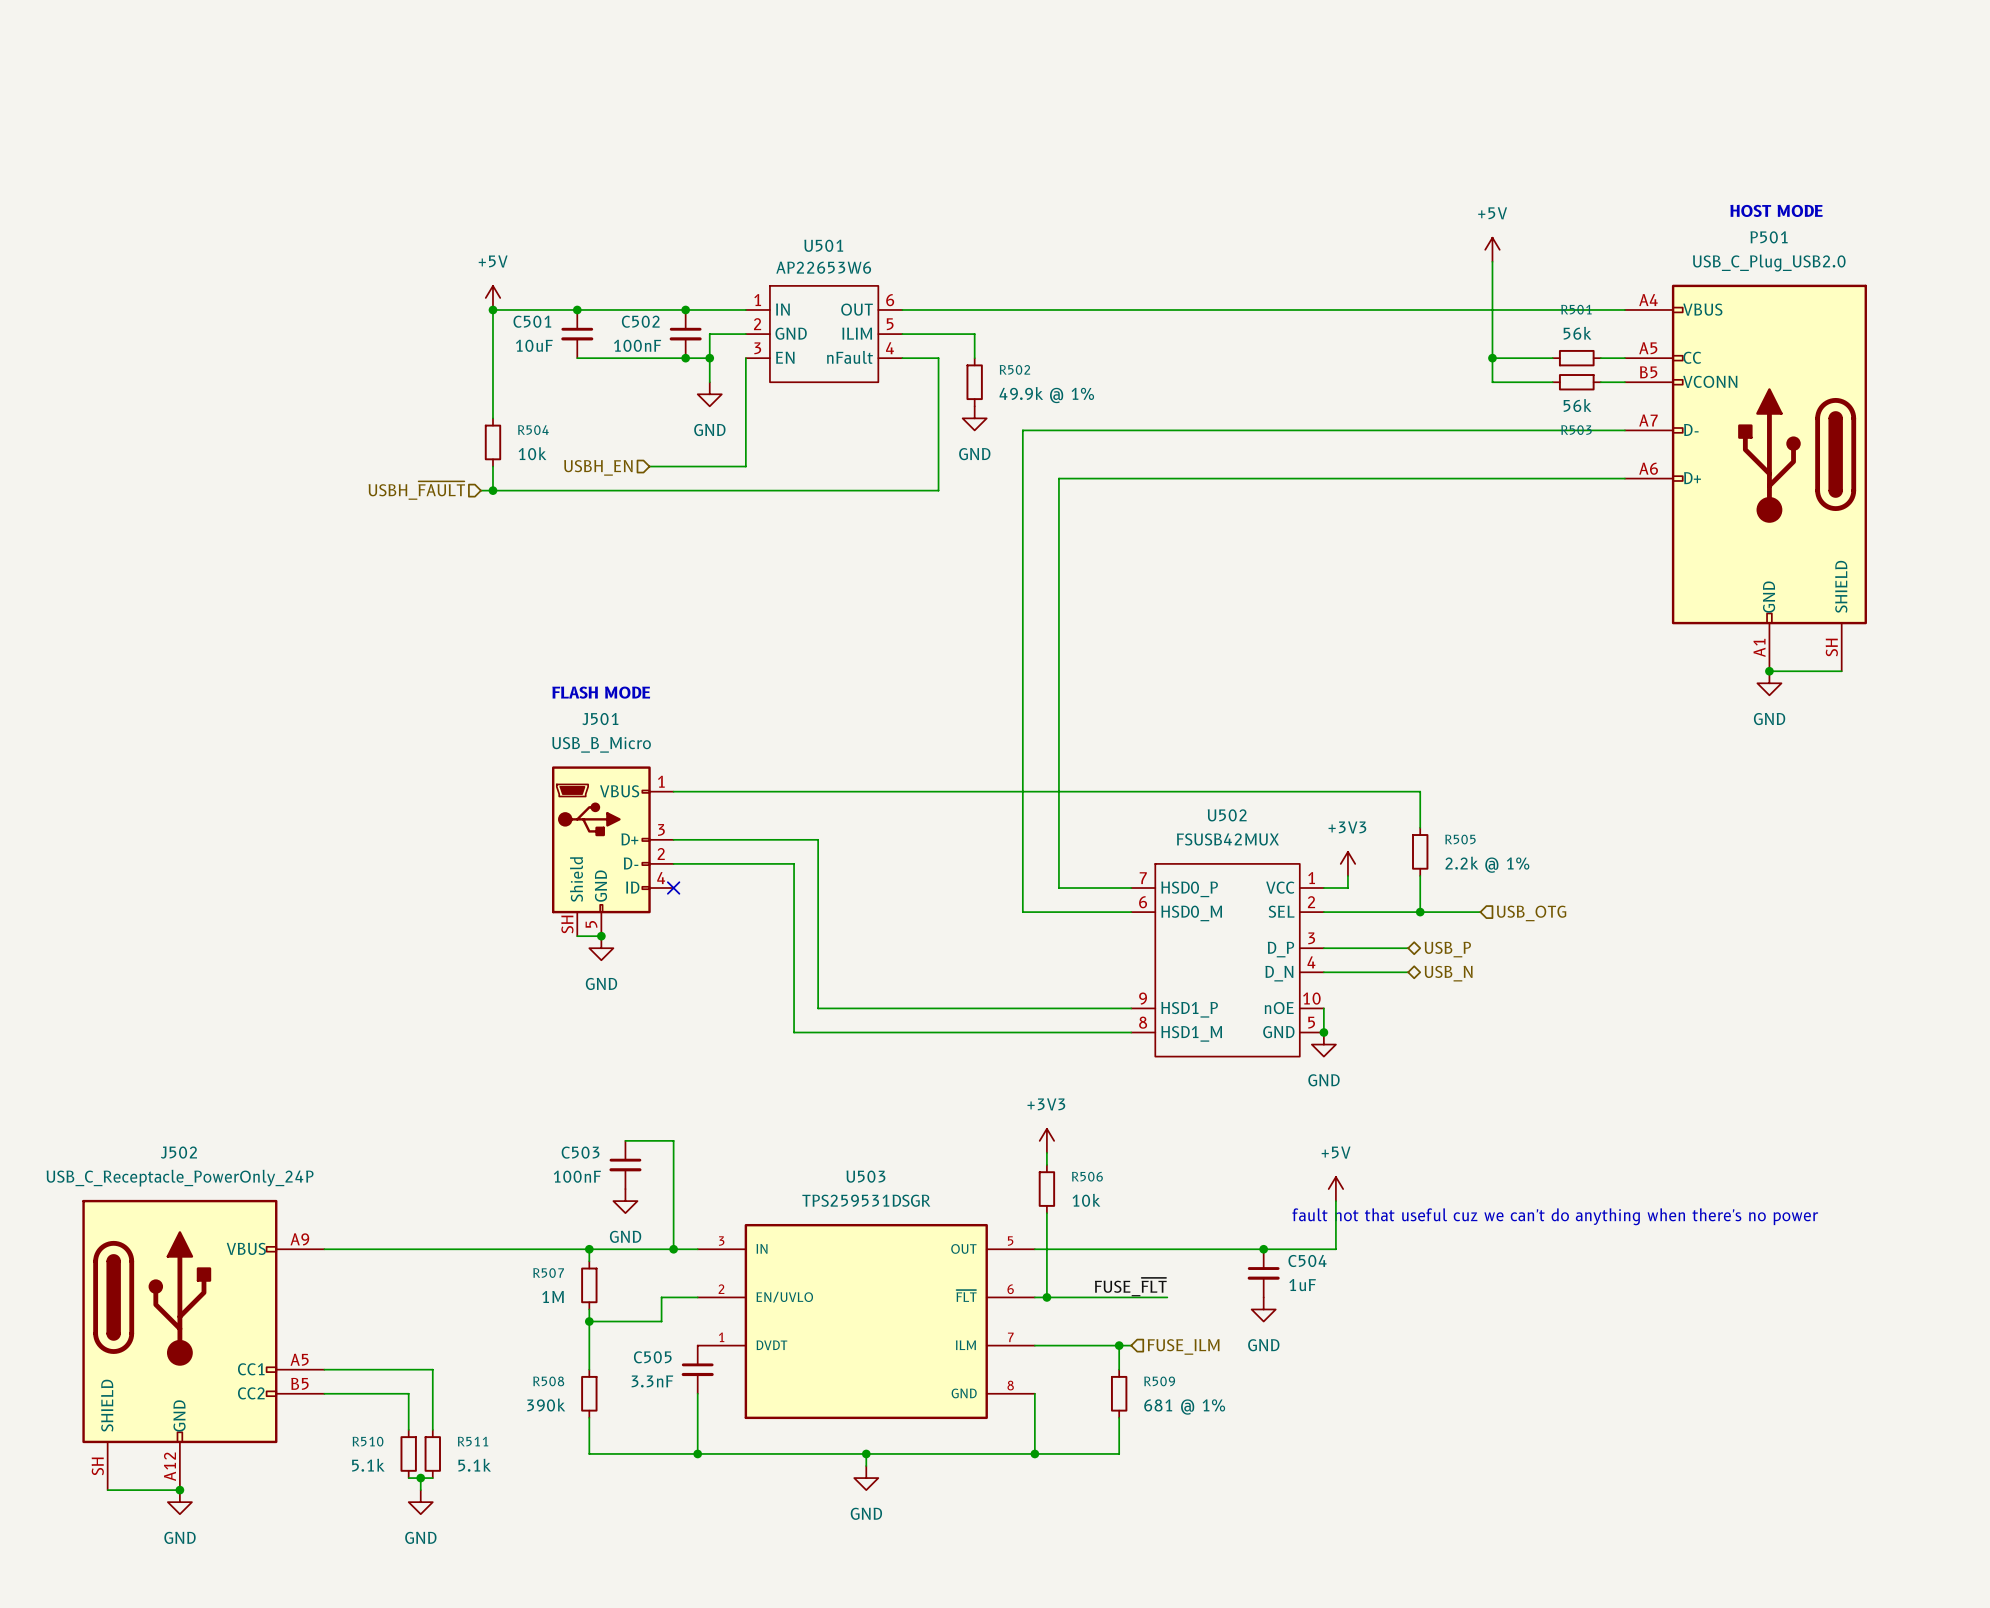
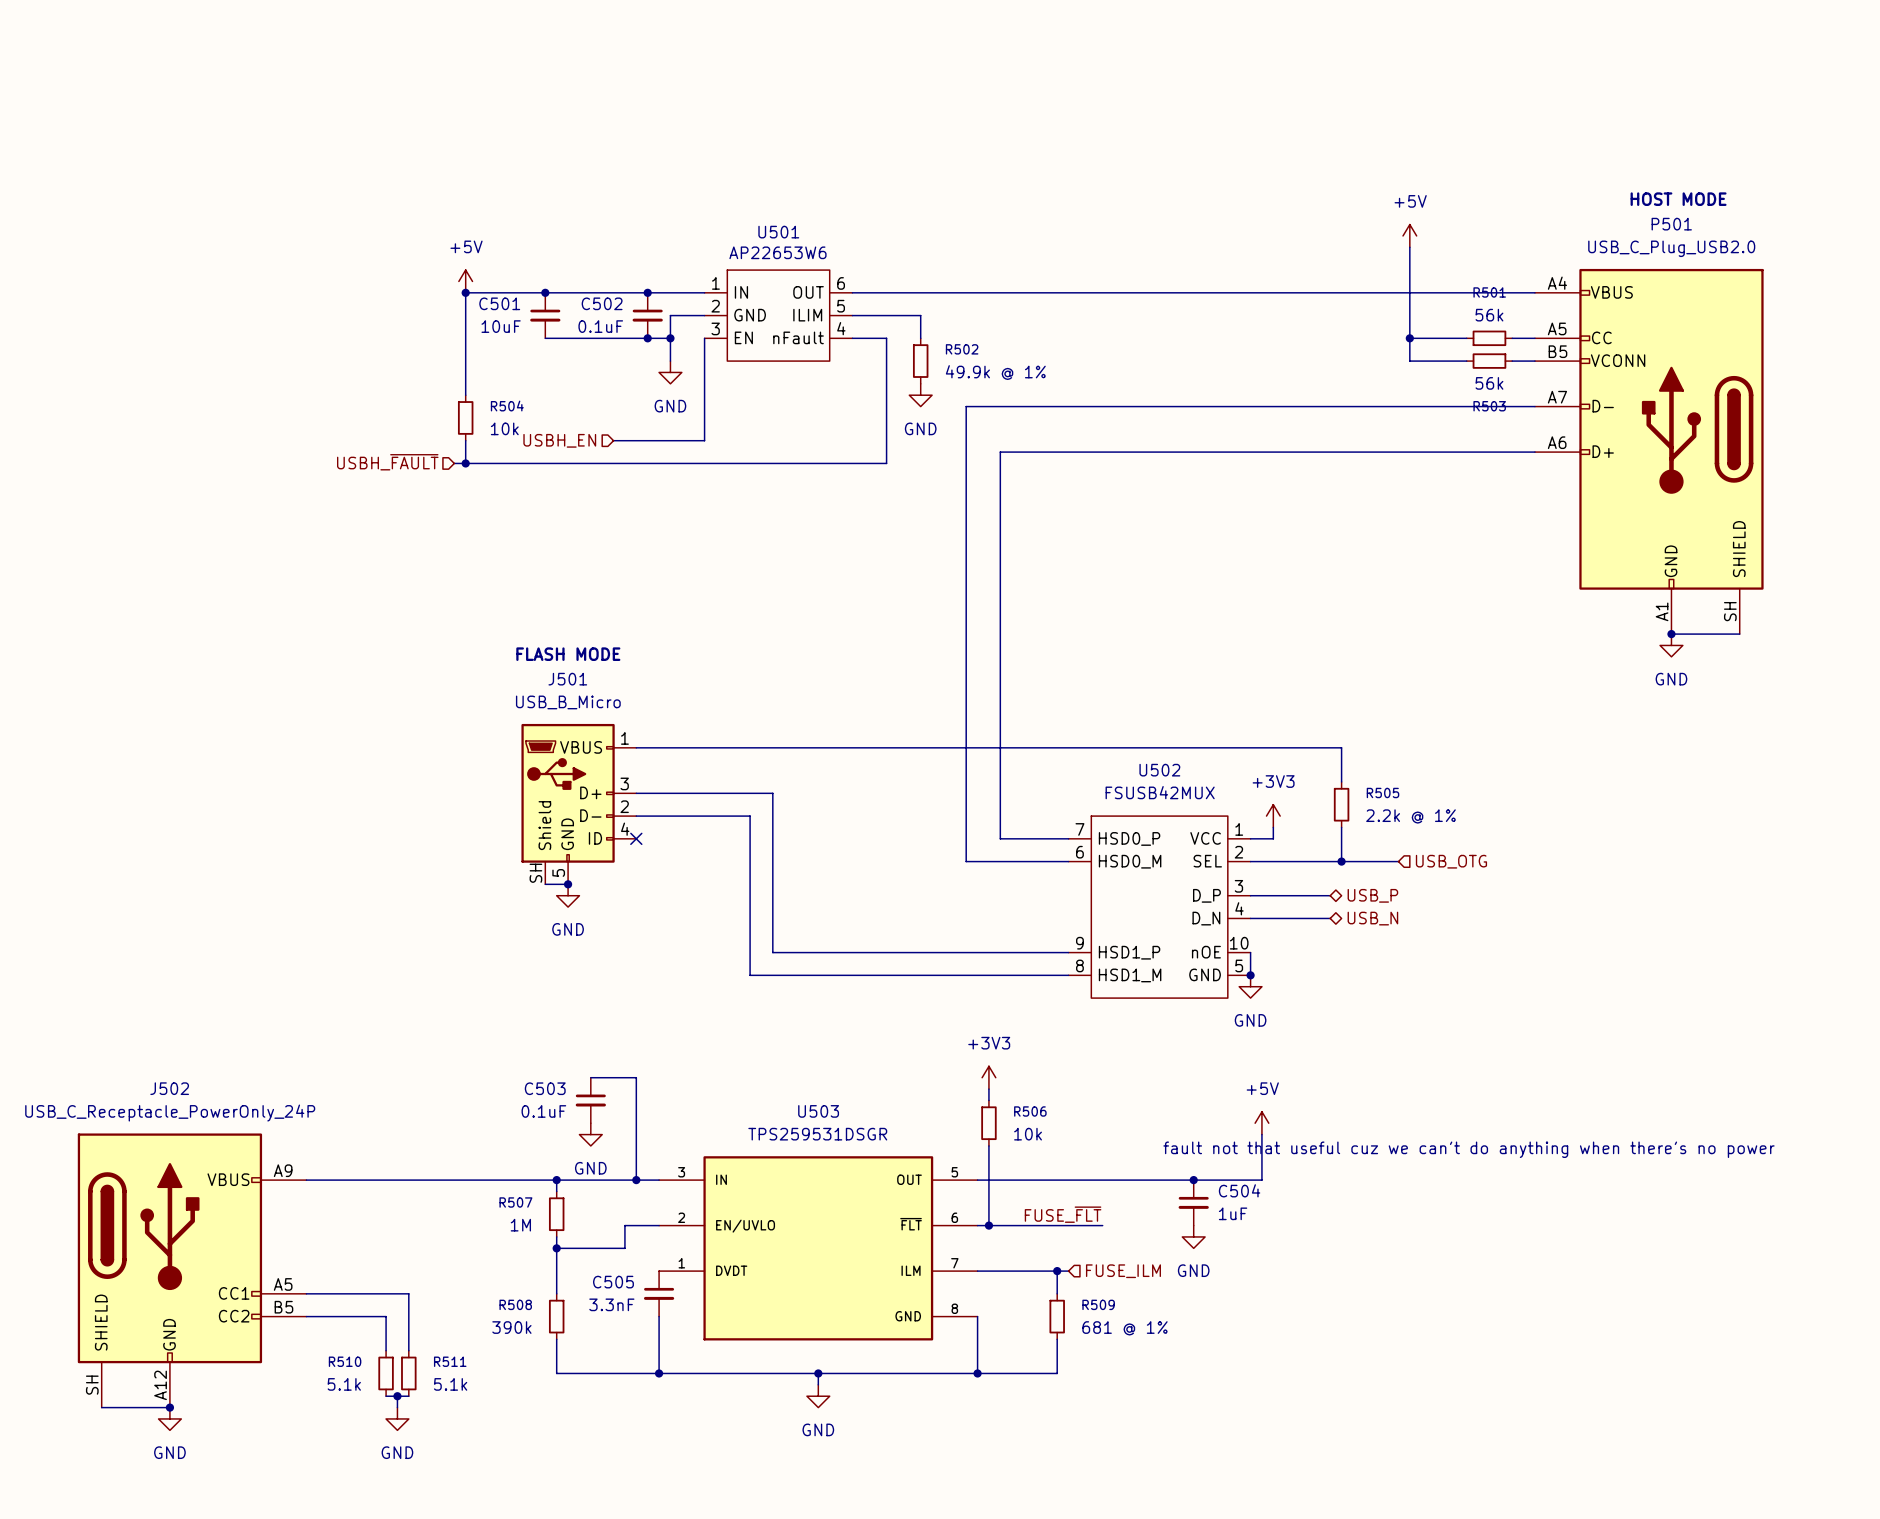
C502 value: 100nF (637, 345) -> 0.1uF (600, 326)
C503 value: 100nF (577, 1176) -> 0.1uF (543, 1111)

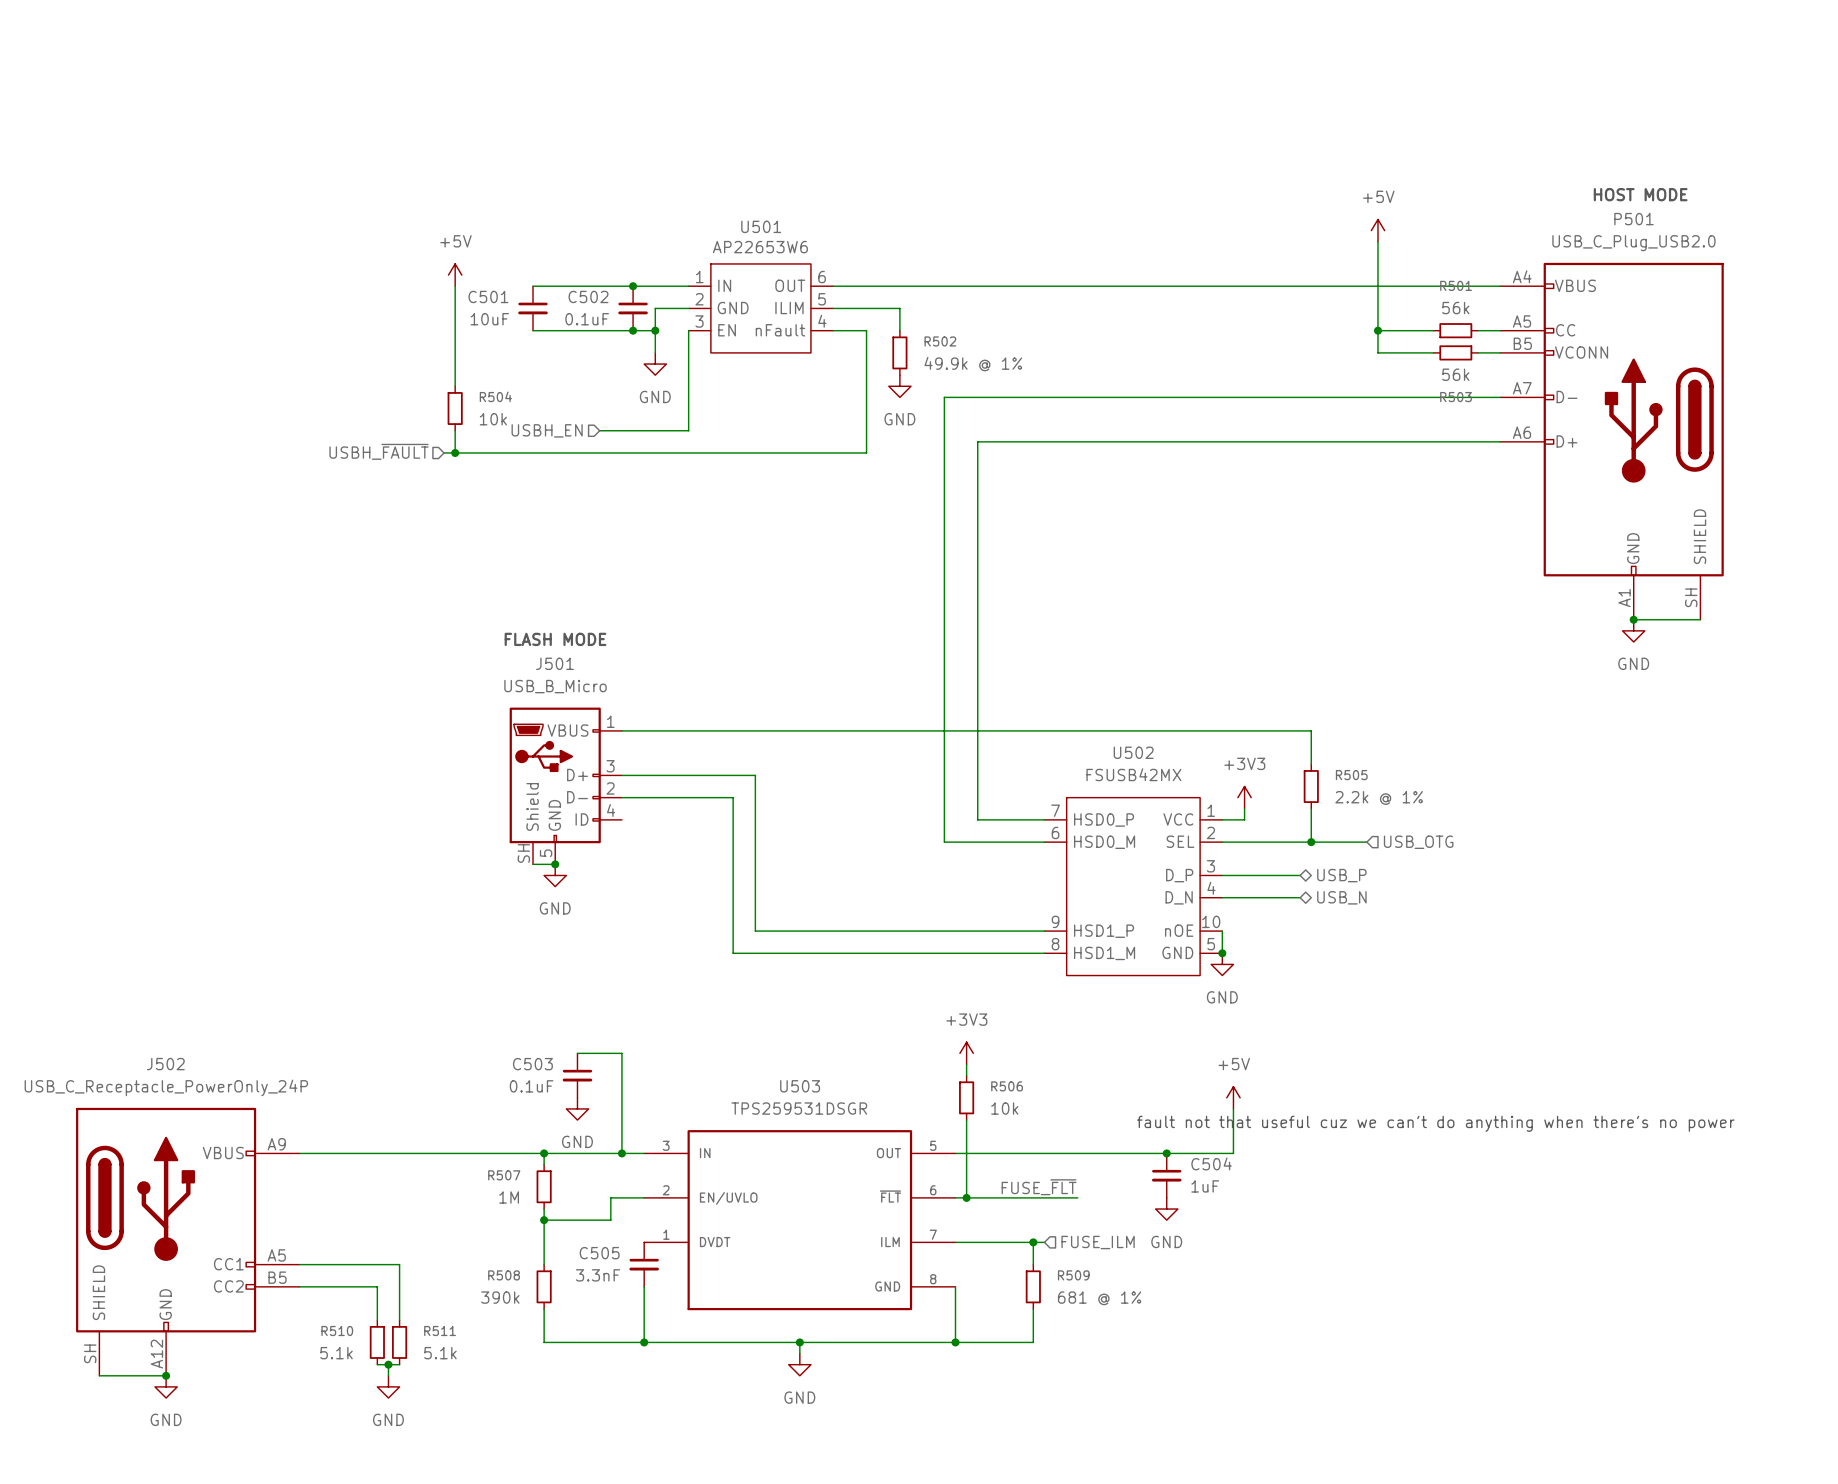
wire: (465, 292) (545, 292) -> none
junction: (465, 292) -> none
junction: (545, 292) -> none
U502 value: FSUSB42MUX (1160, 792) -> FSUSB42MX (1133, 774)
no-connect mark: (636, 838) -> none

